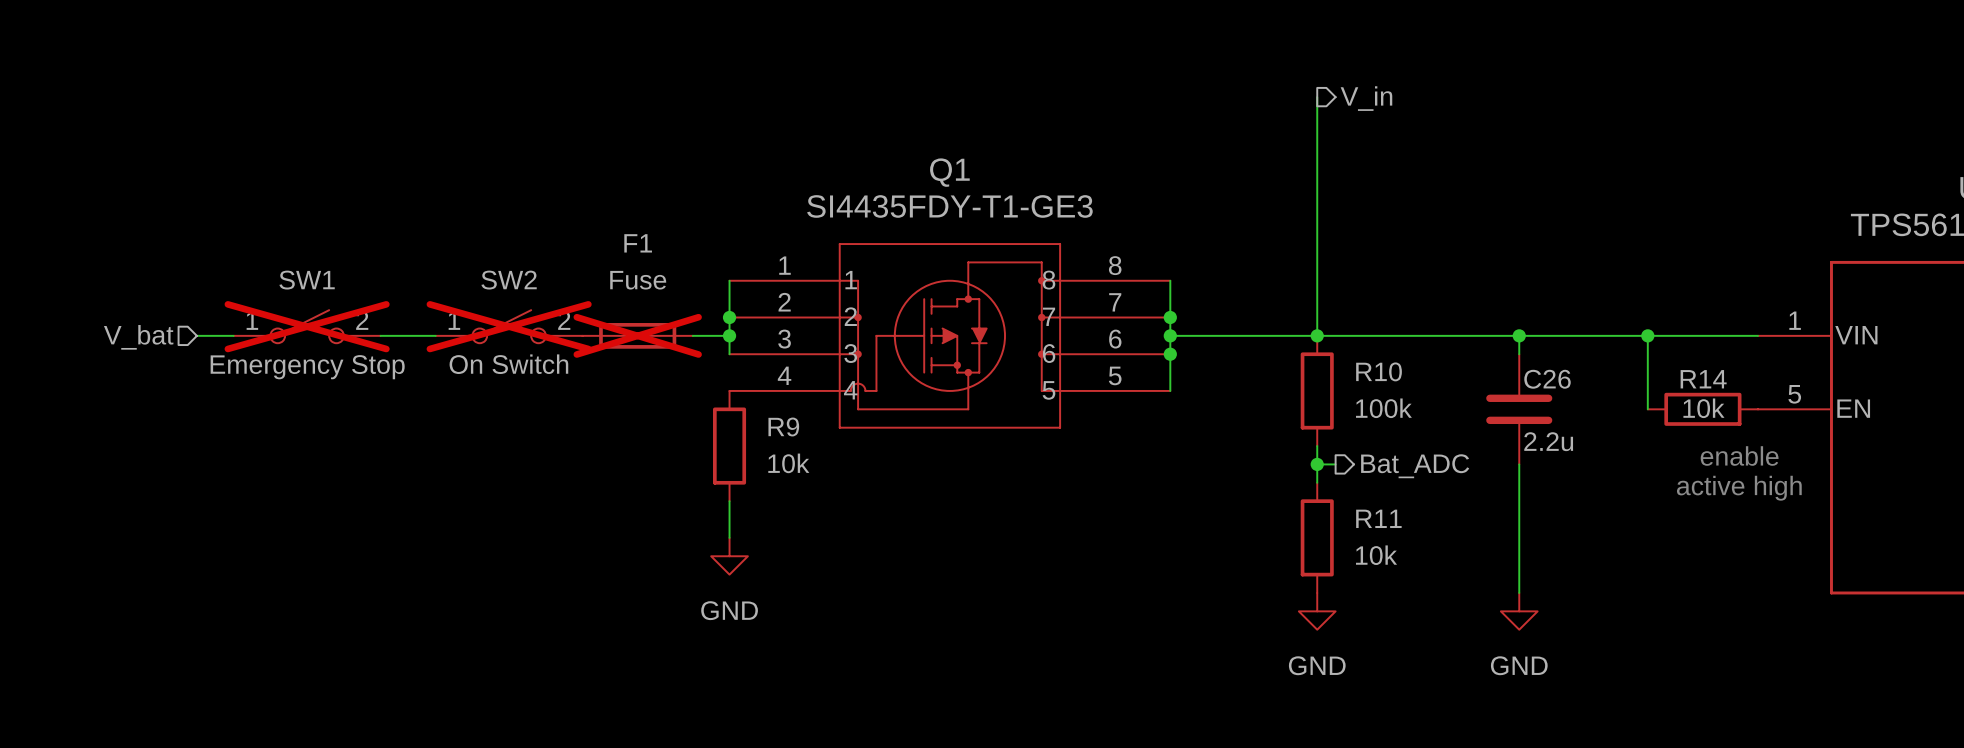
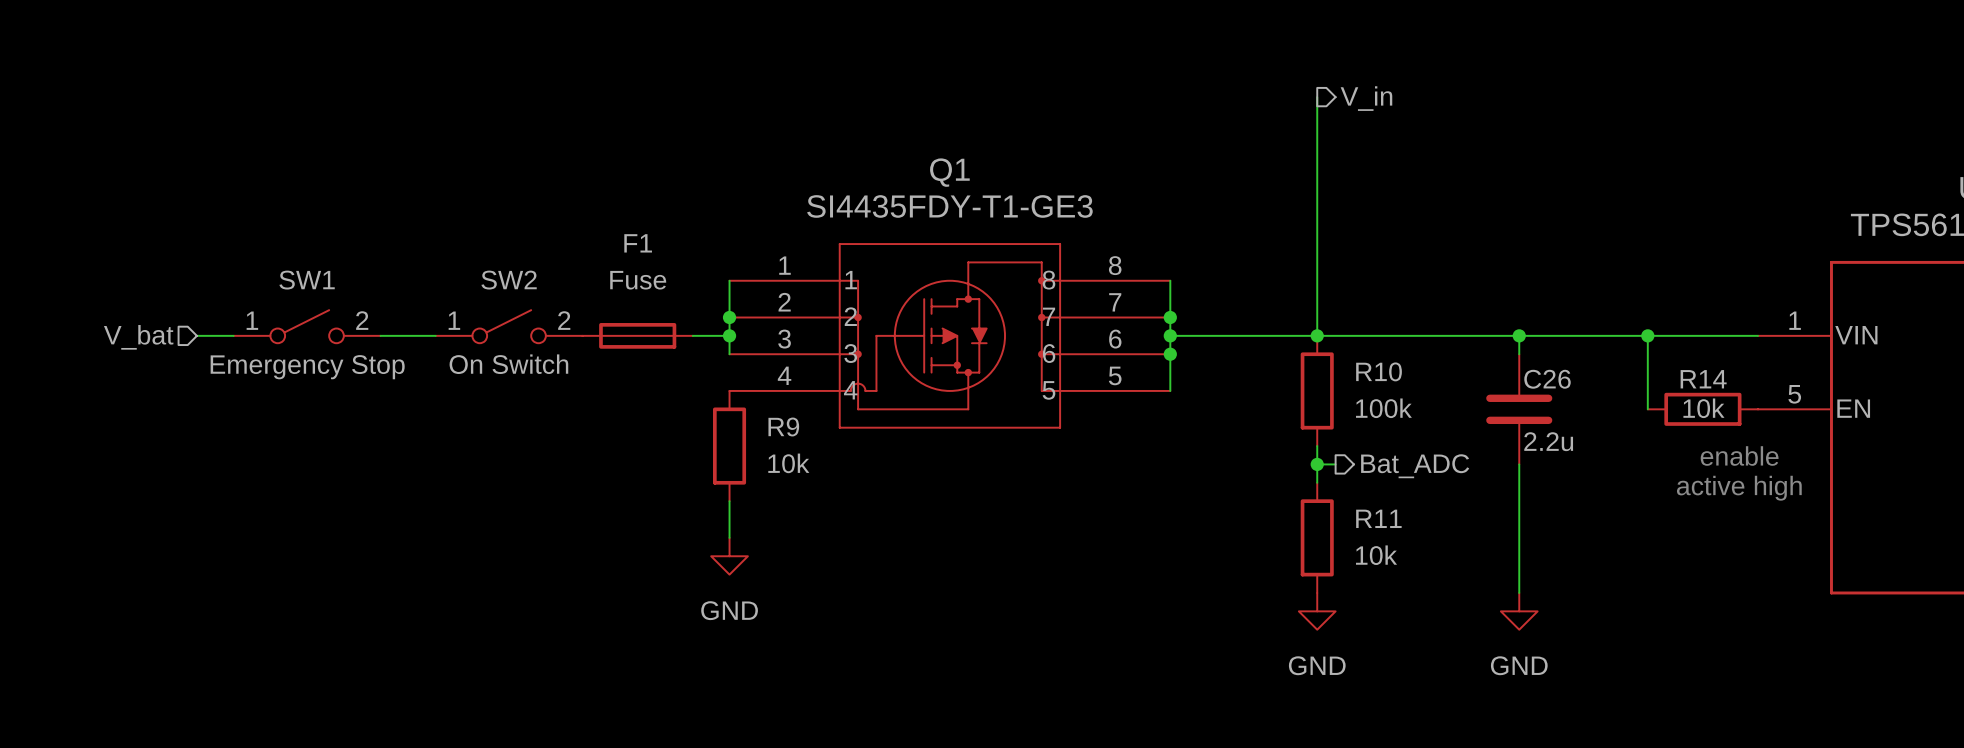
SW1 do-not-place cross: (307, 326) -> none
SW2 do-not-place cross: (509, 326) -> none
F1 do-not-place cross: (637, 335) -> none

